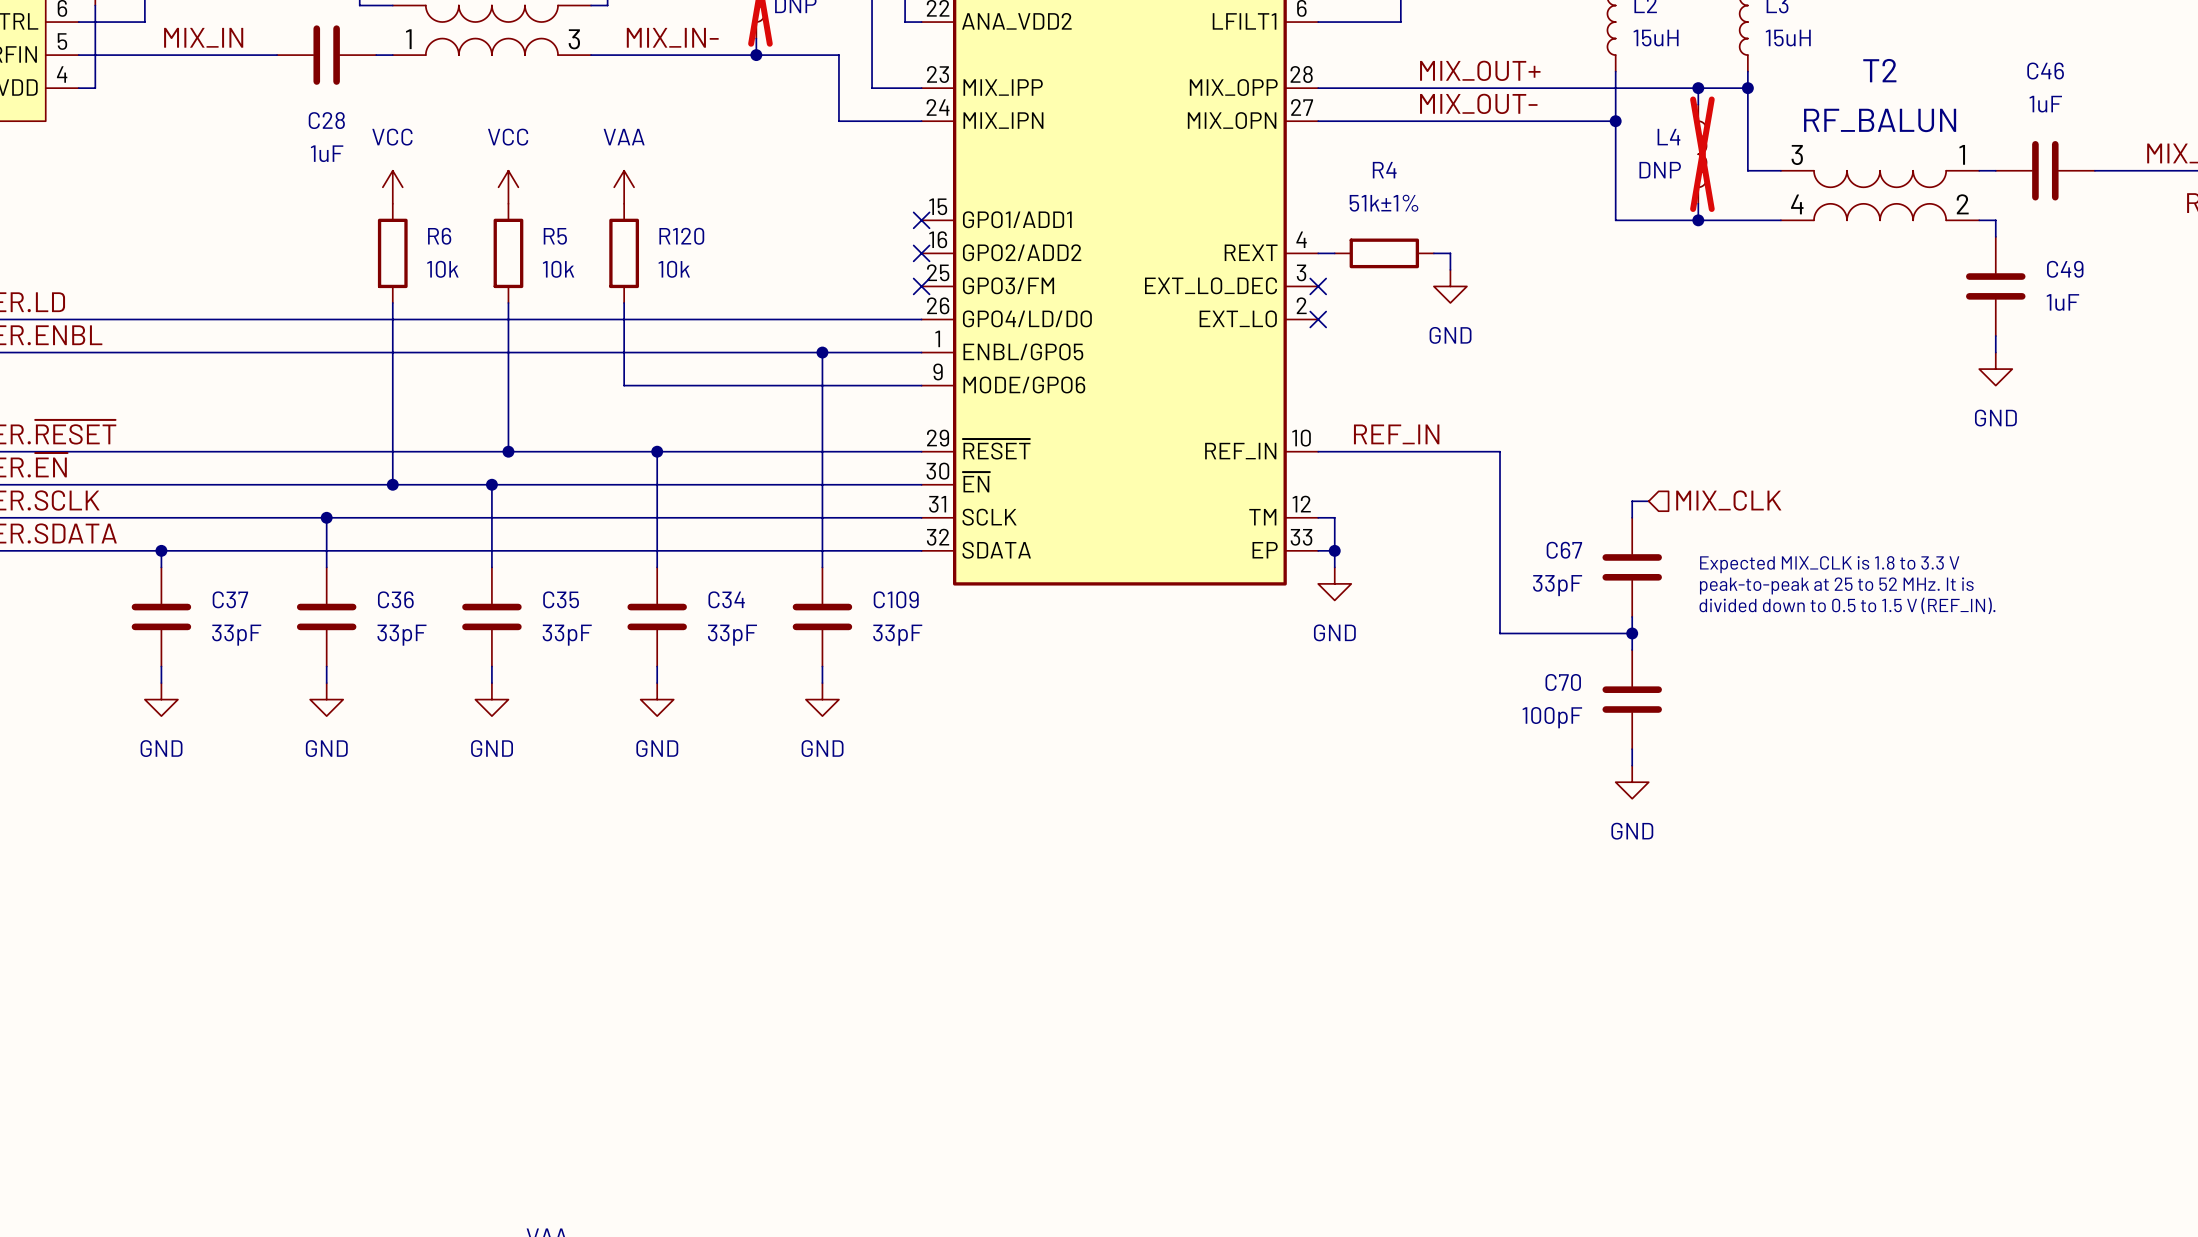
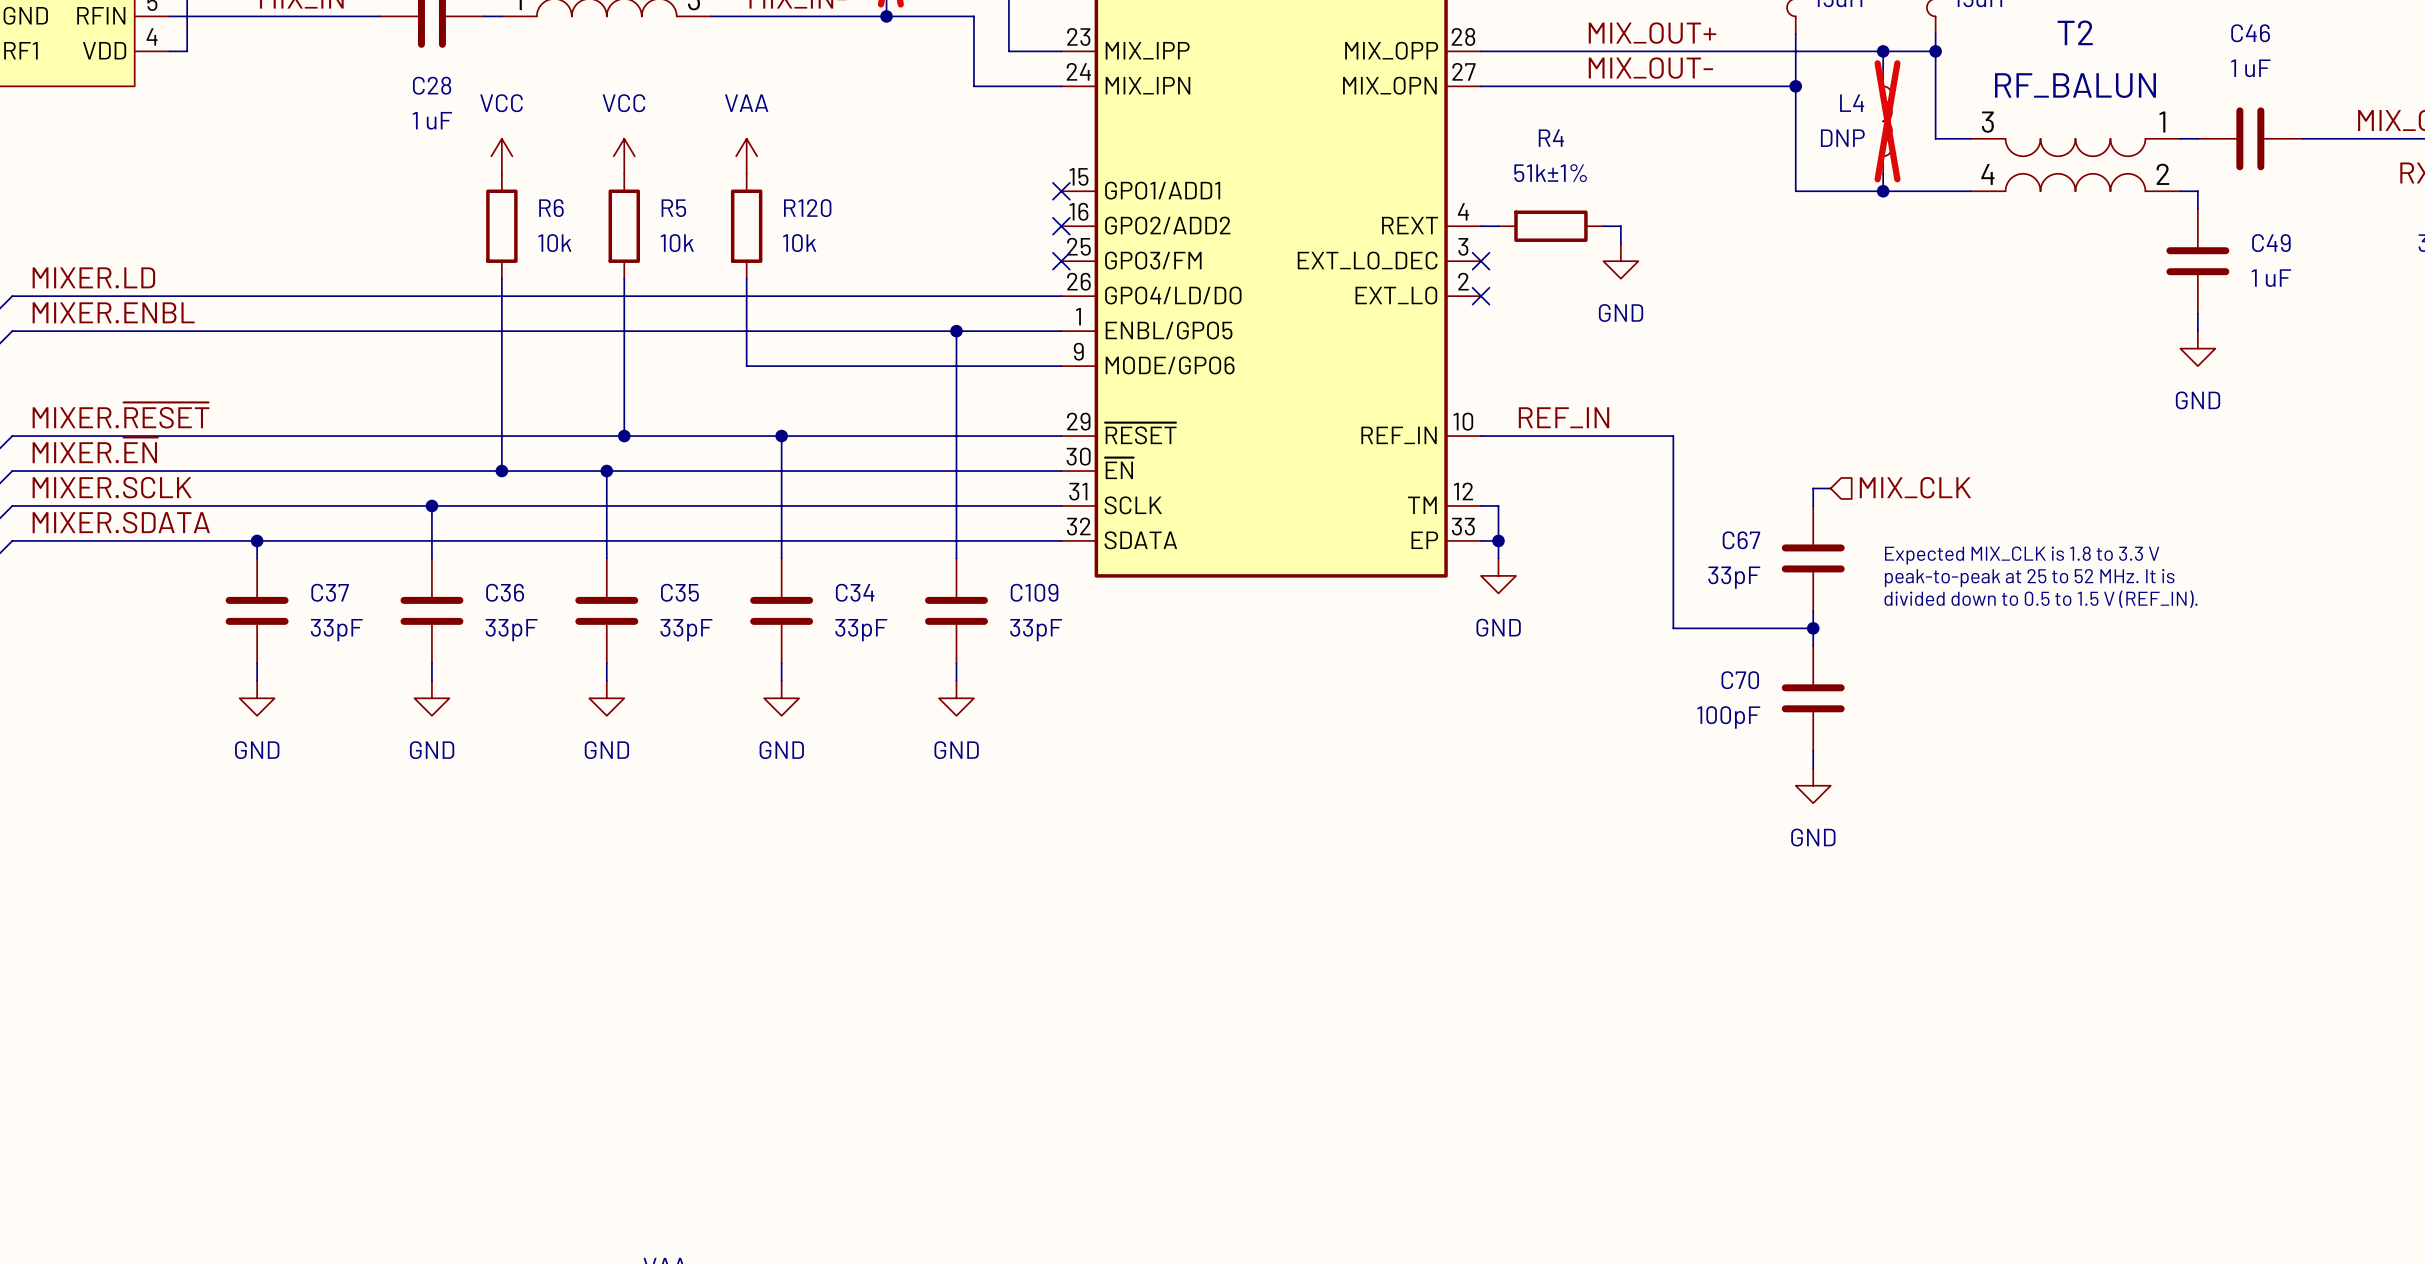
C46 value: 1uF (2045, 104) -> 1 uF (2250, 68)
C28 value: 1uF (327, 153) -> 1 uF (432, 120)
C49 value: 1uF (2062, 302) -> 1 uF (2271, 278)

